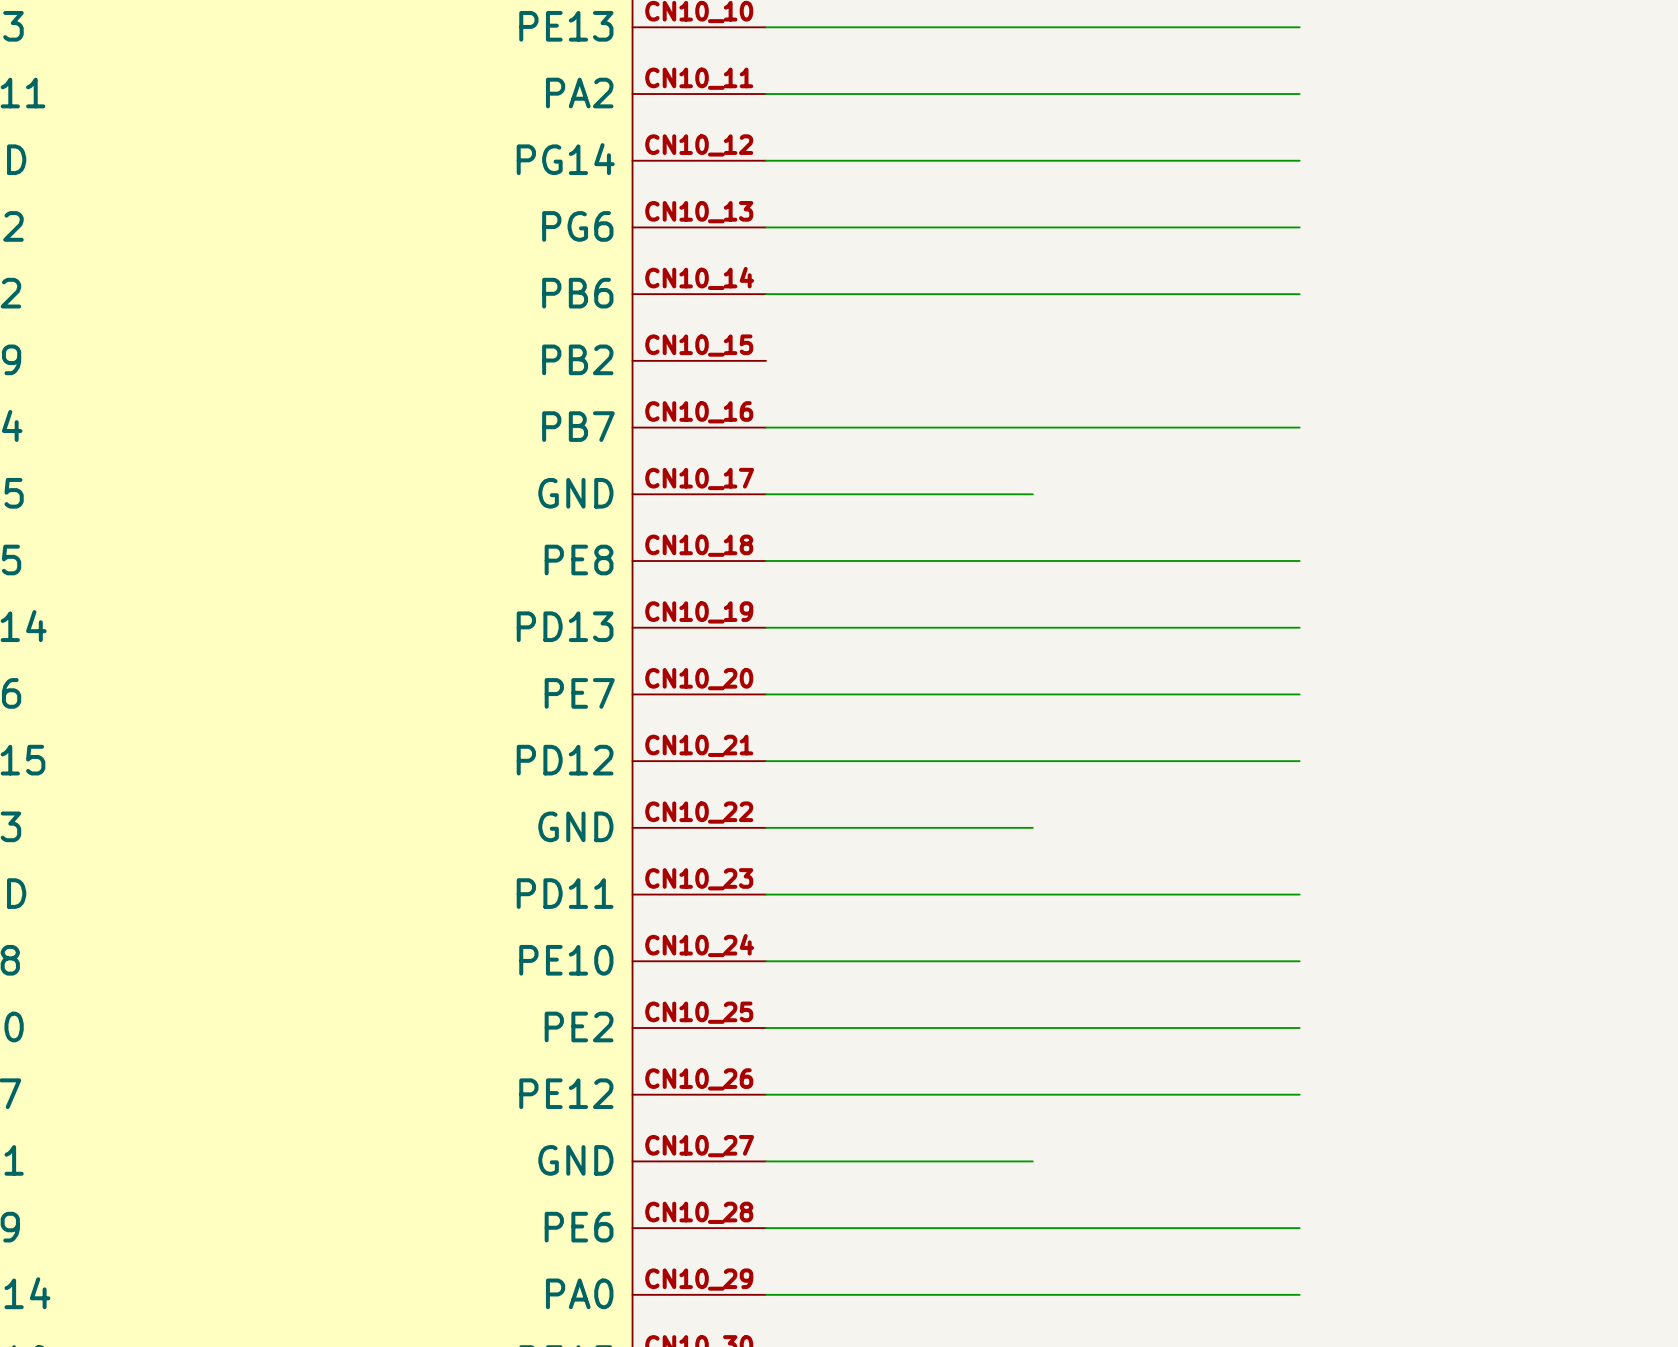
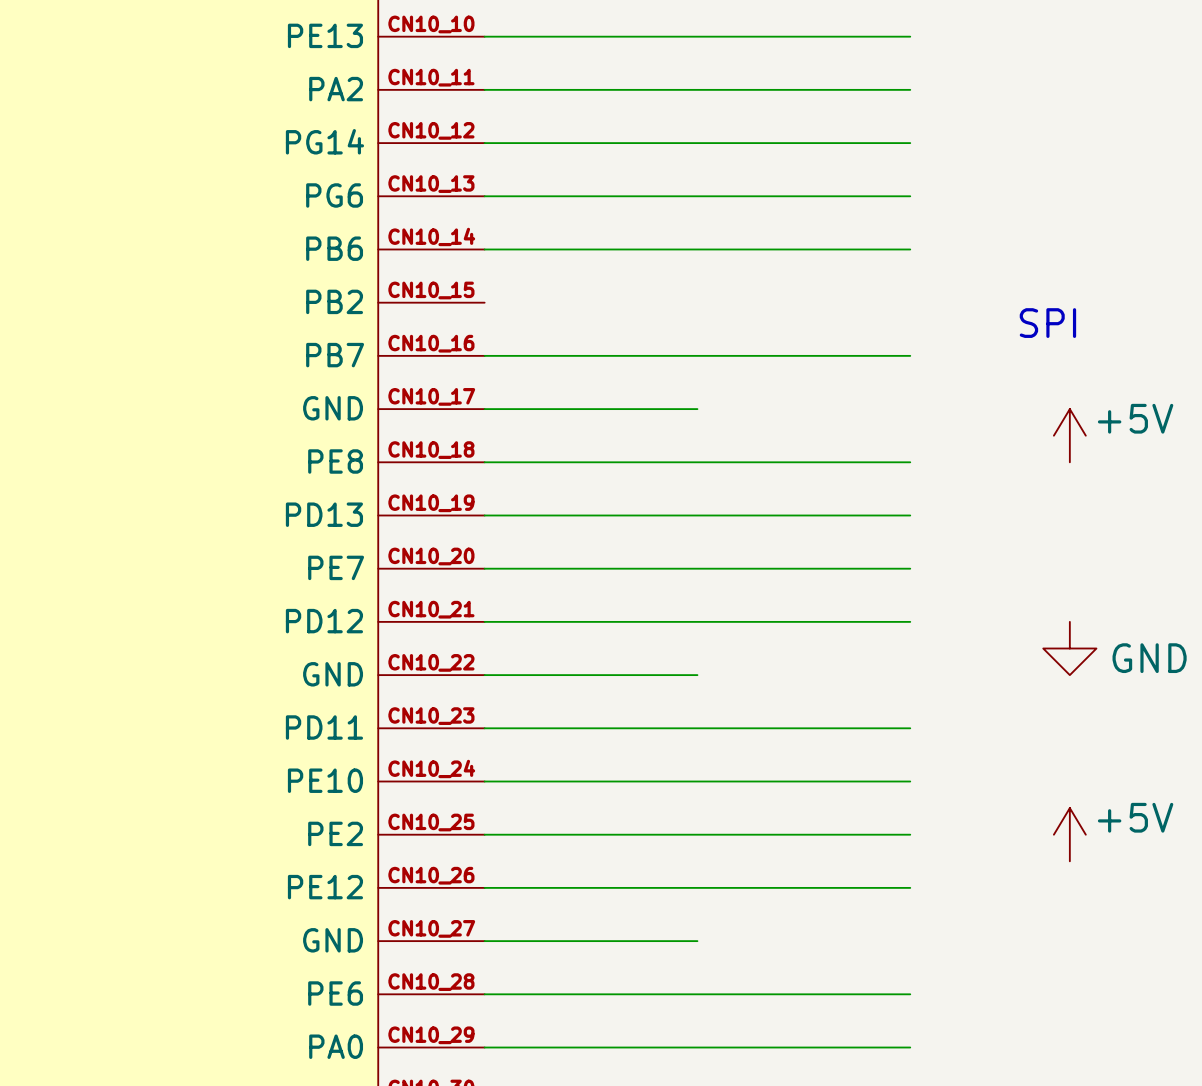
text: none -> SPI (1047, 323)
power symbol: none -> +5V (1069, 435)
power symbol: none -> GND (1069, 648)
power symbol: none -> +5V (1069, 834)

